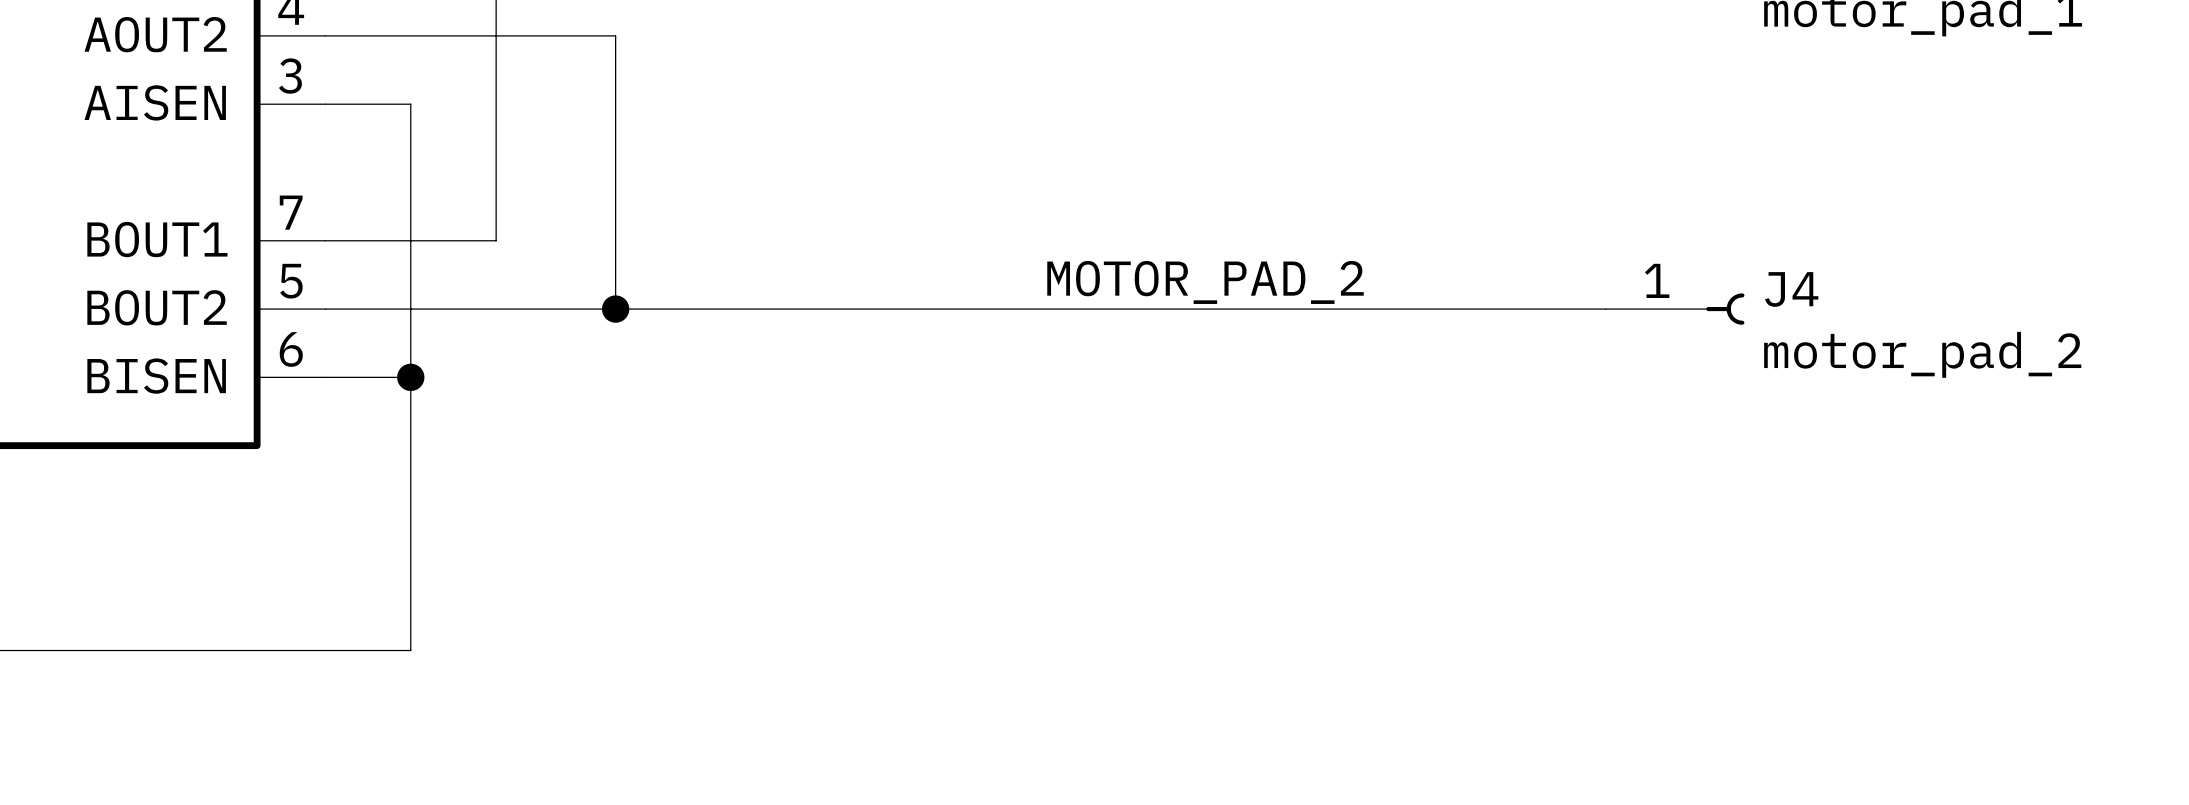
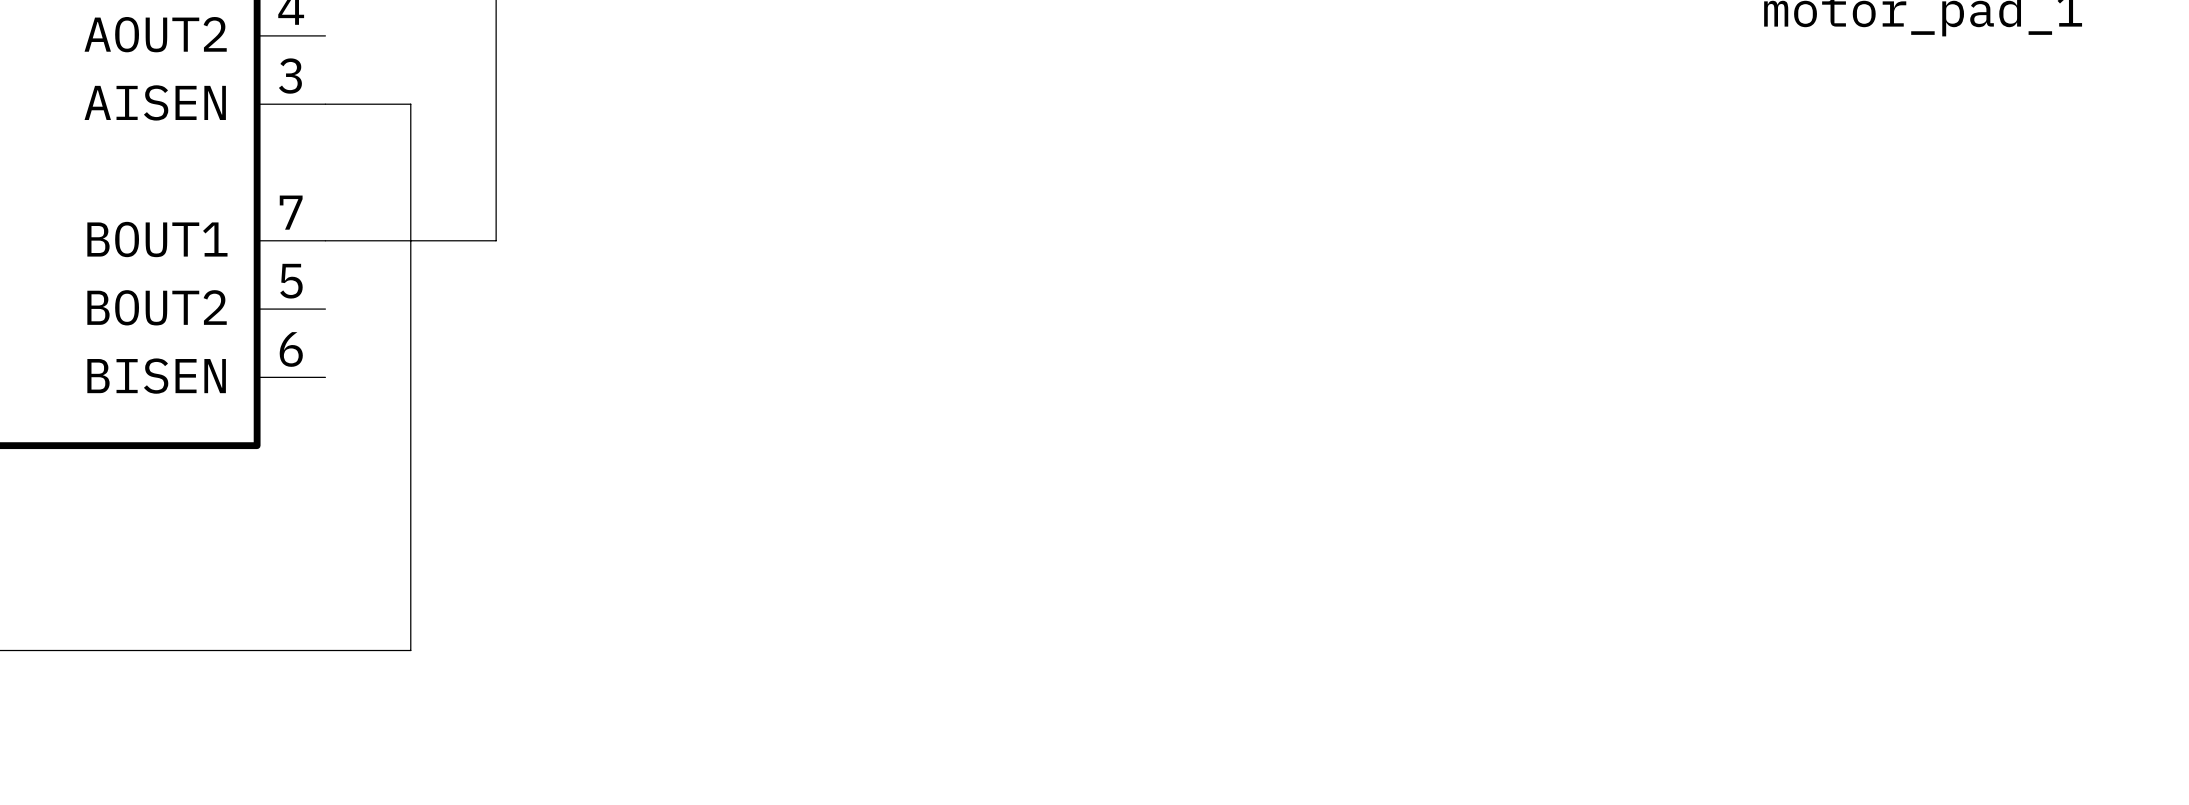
wire: (325, 35) (615, 35) (615, 309) -> none
label: MOTOR_PAD_2 (1205, 282) -> none
wire: (325, 309) (1605, 309) -> none
junction: (615, 309) -> none
J4: motor_pad_2 (1675, 309) -> none
wire: (325, 377) (410, 377) -> none
junction: (410, 377) -> none

